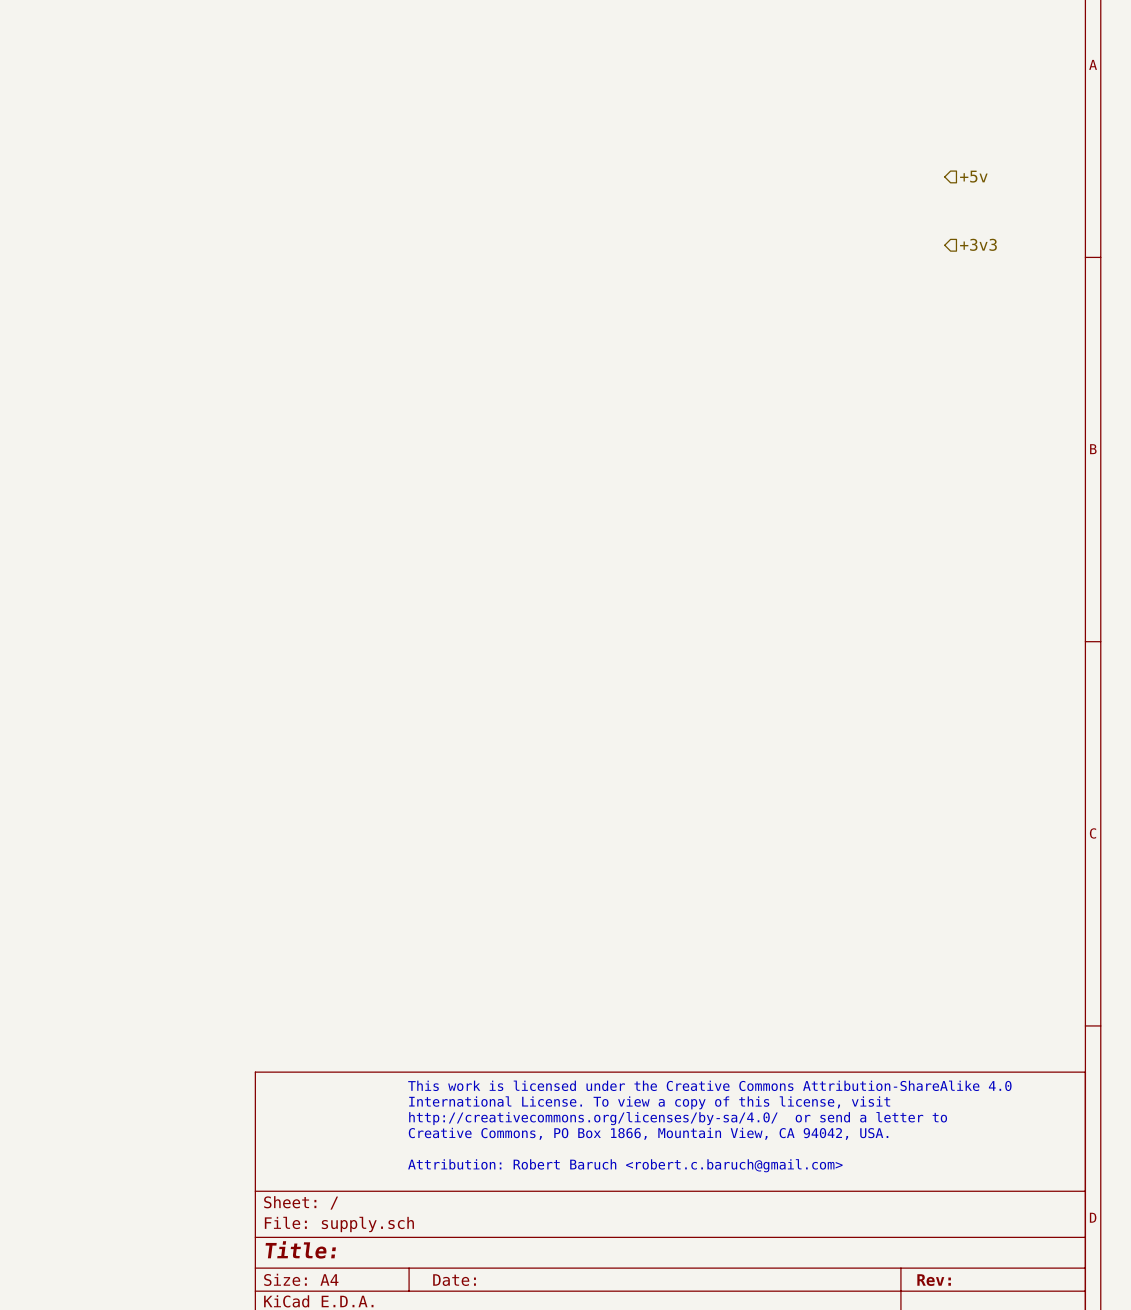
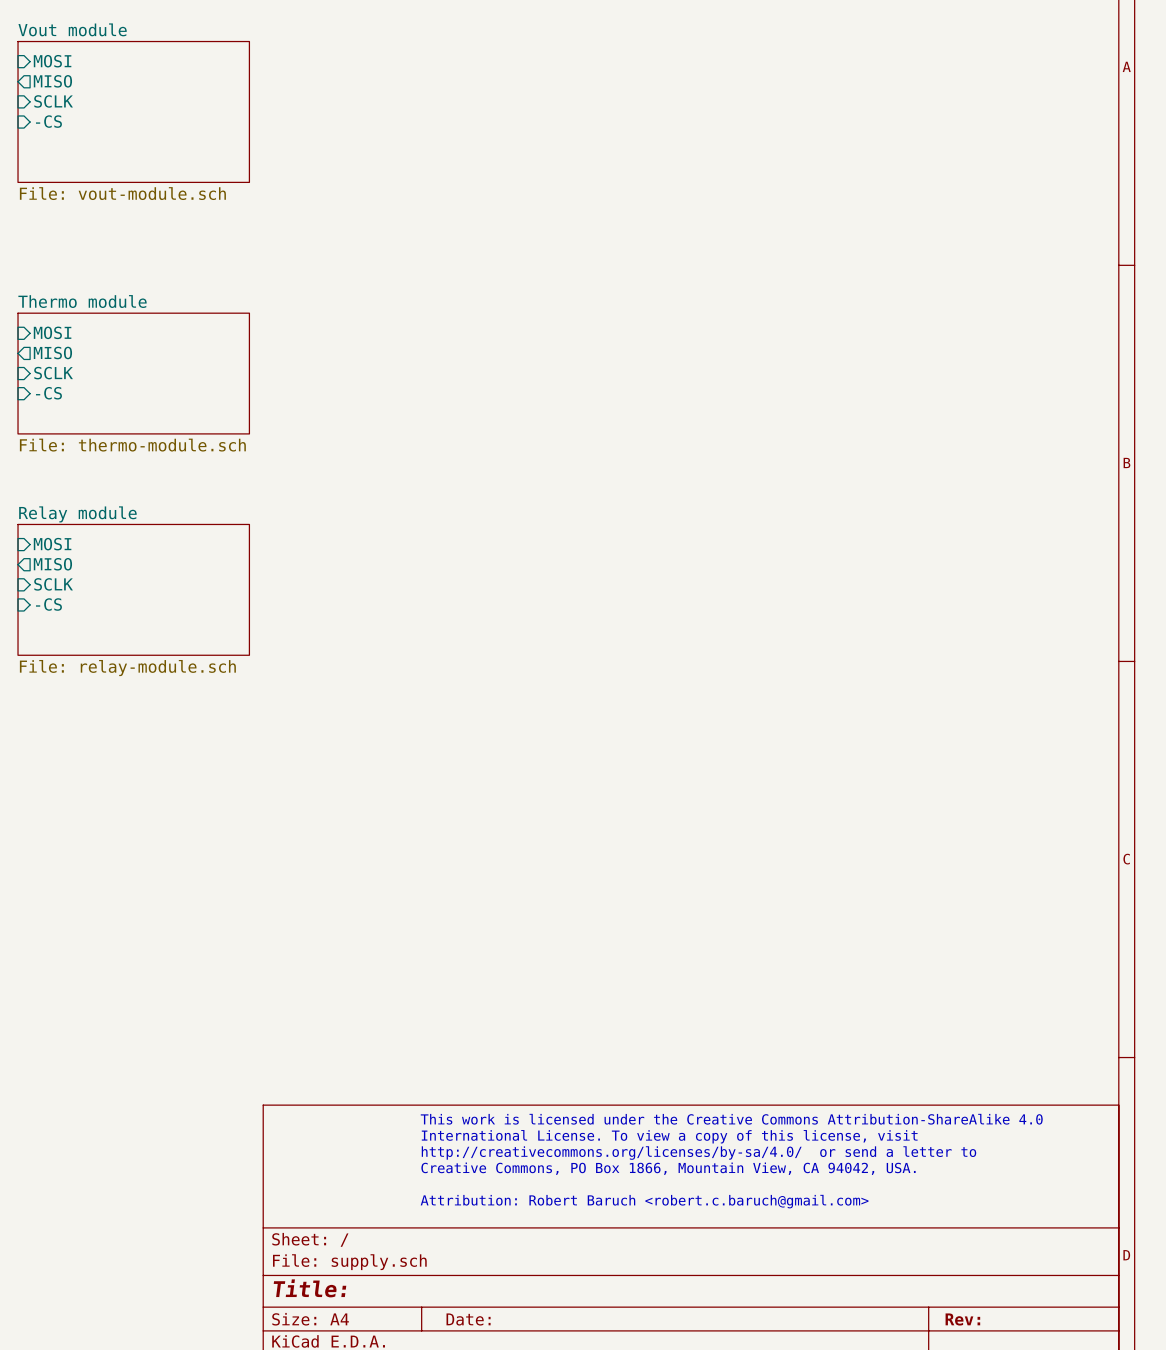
sheet pin: none -> MOSI (52, 61)
sheet pin: none -> MISO (52, 81)
sheet pin: none -> SCLK (53, 101)
sheet Vout module: none -> File: vout-module.sch (133, 111)
sheet pin: none -> -CS (48, 121)
hierarchical label: +5v (973, 176) -> none
hierarchical label: +3v3 (978, 244) -> none
sheet pin: none -> MOSI (52, 332)
sheet pin: none -> MISO (52, 352)
sheet pin: none -> SCLK (53, 373)
sheet Thermo module: none -> File: thermo-module.sch (133, 373)
sheet pin: none -> -CS (48, 393)
sheet pin: none -> MOSI (52, 544)
sheet pin: none -> MISO (52, 564)
sheet pin: none -> SCLK (53, 584)
sheet Relay module: none -> File: relay-module.sch (133, 589)
sheet pin: none -> -CS (48, 604)

